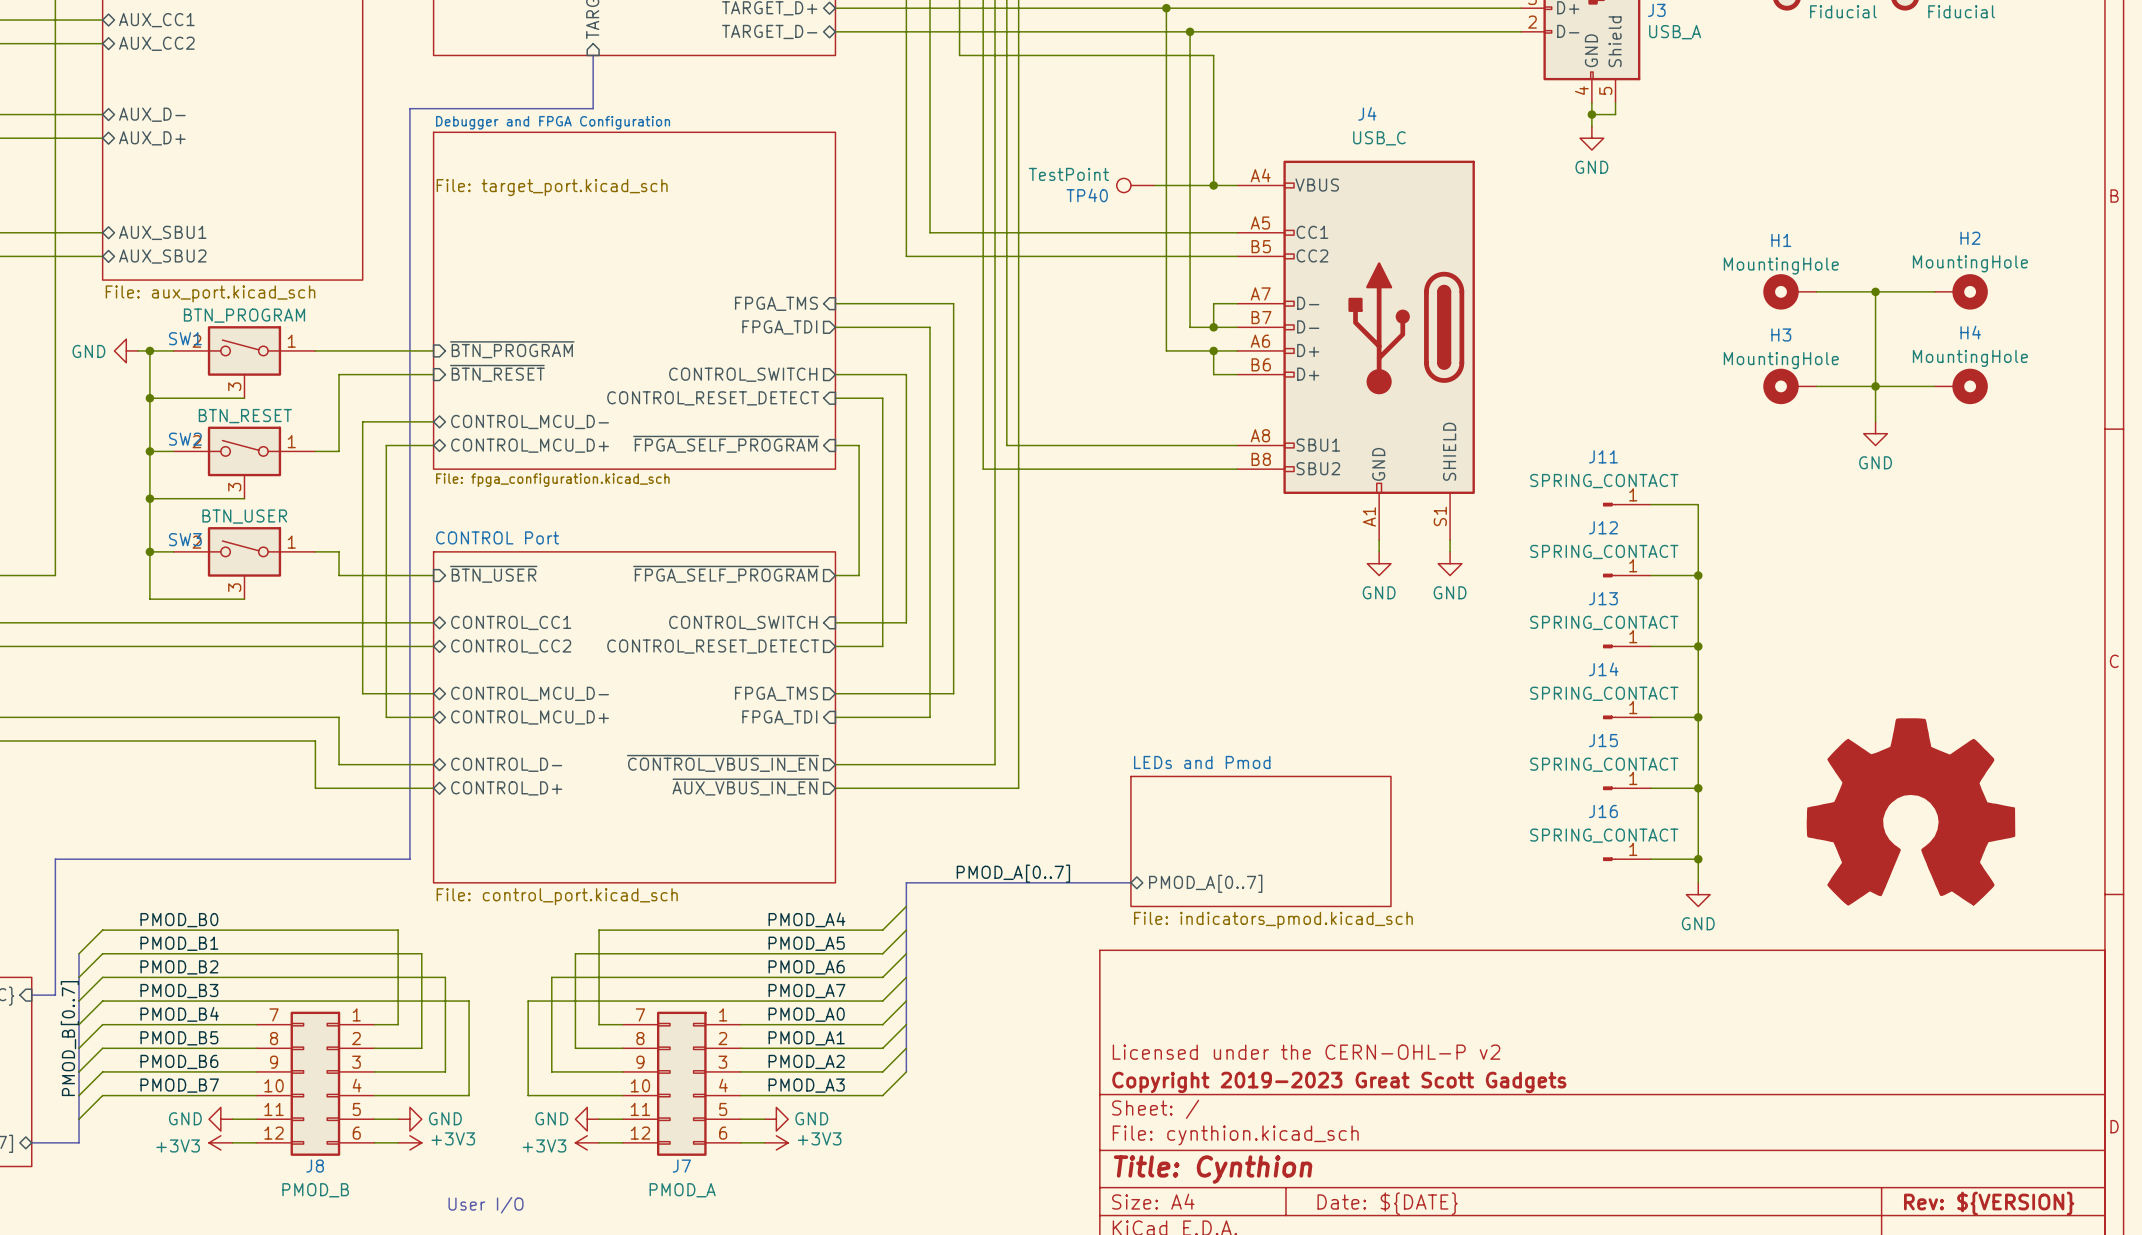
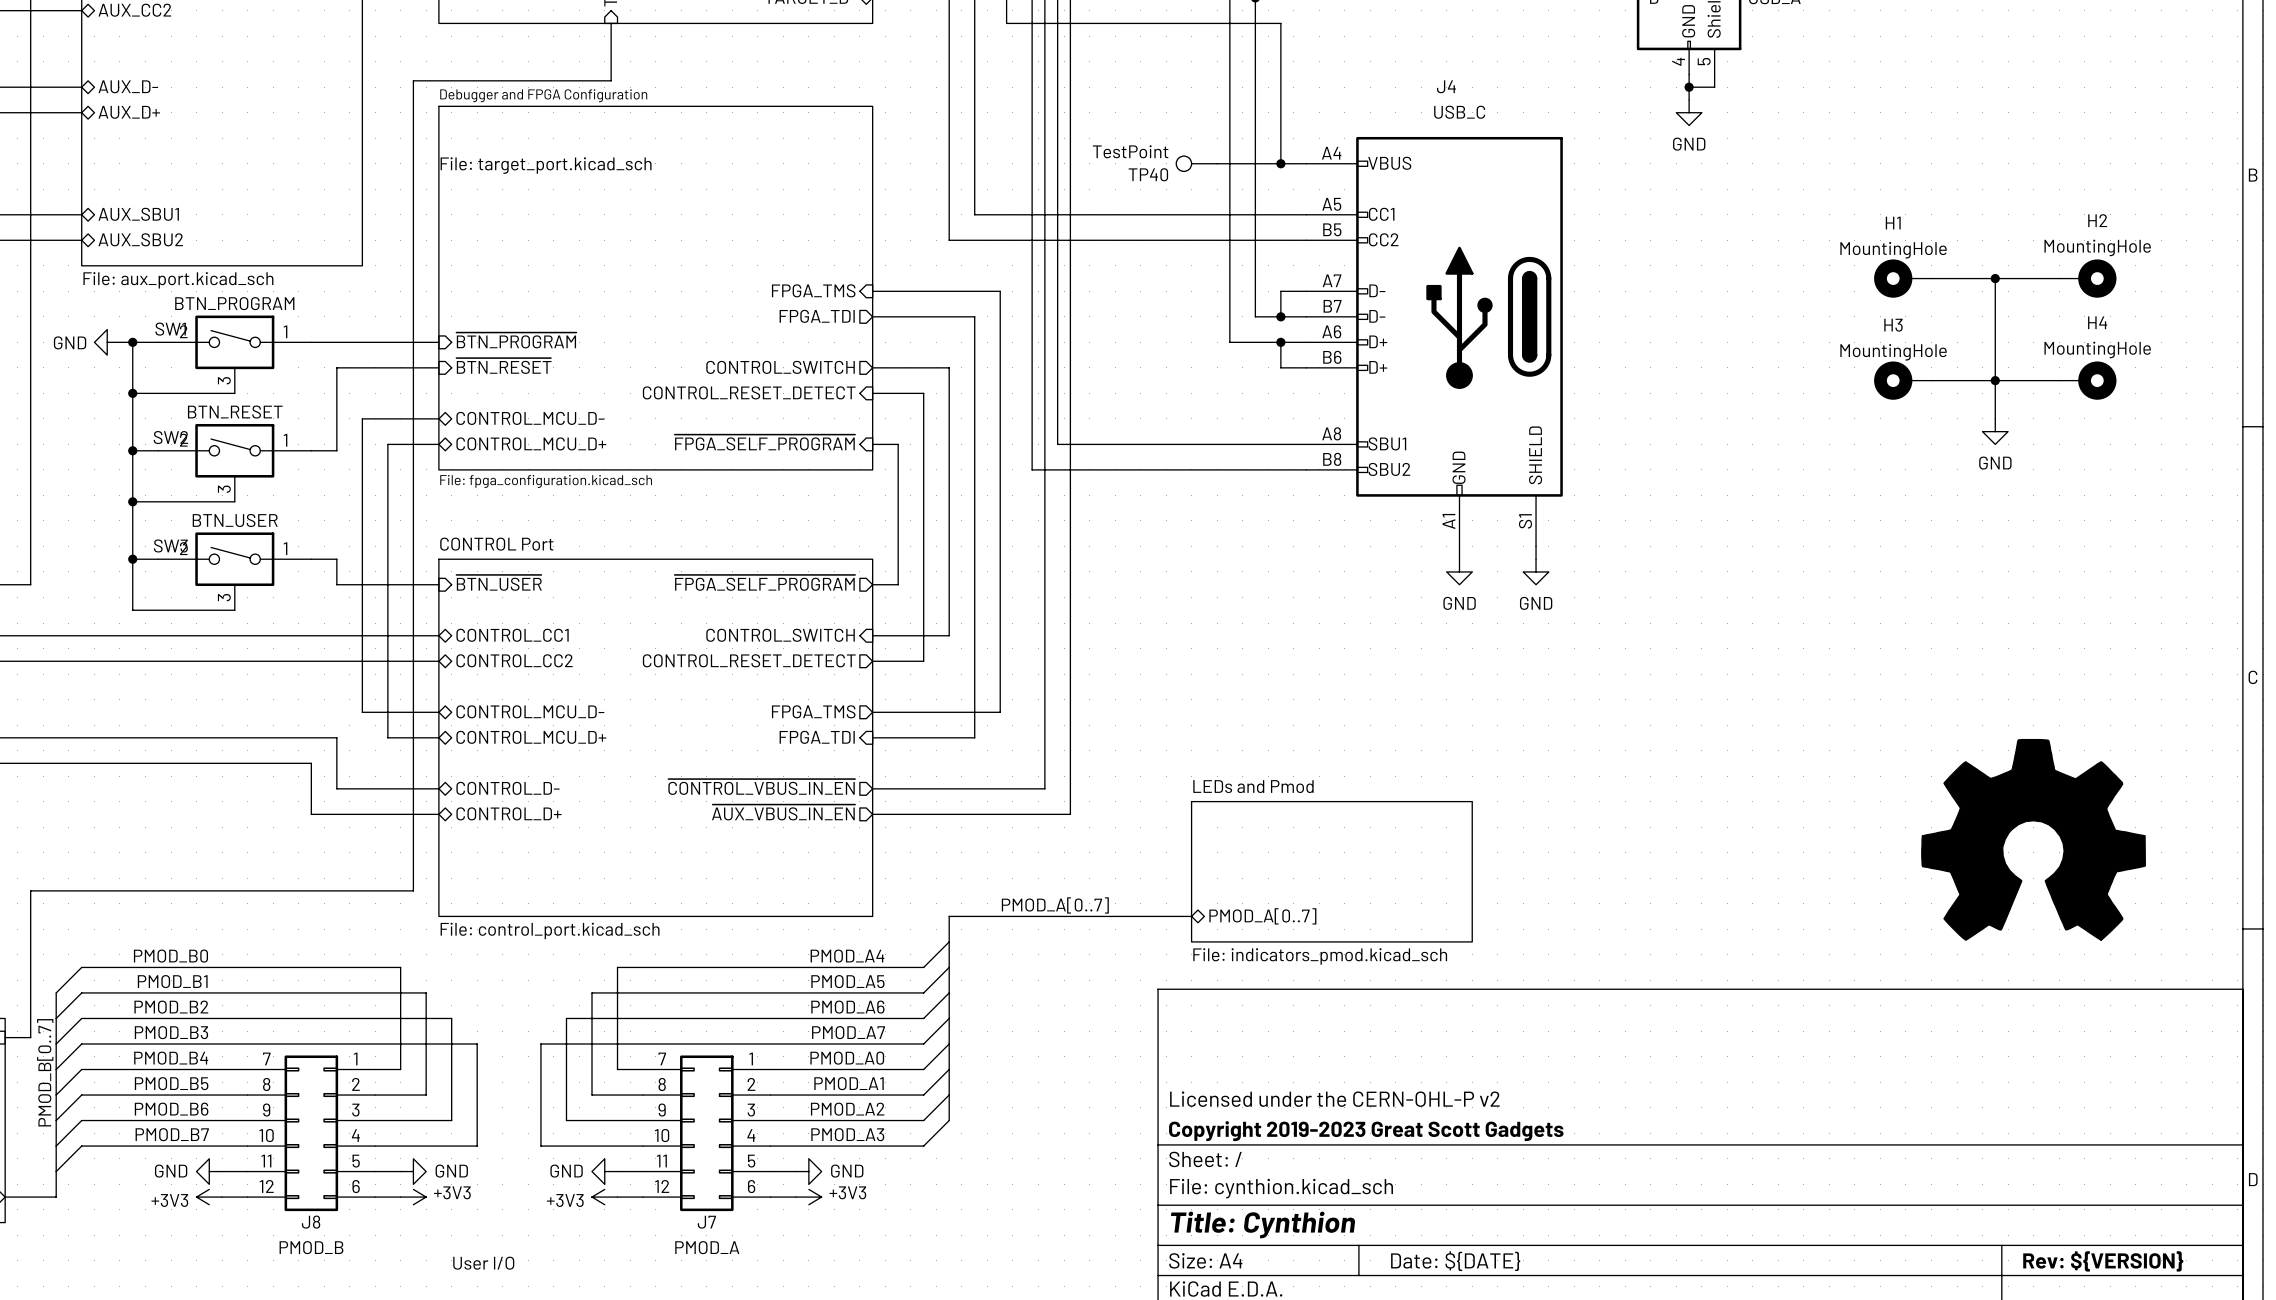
J11: SPRING_CONTACT (1626, 504) -> none
wire: (1650, 504) (1698, 504) (1698, 882) -> none
J12: SPRING_CONTACT (1626, 575) -> none
wire: (1650, 575) (1698, 575) -> none
junction: (1698, 575) -> none
J13: SPRING_CONTACT (1626, 646) -> none
wire: (1650, 646) (1698, 646) -> none
junction: (1698, 646) -> none
J14: SPRING_CONTACT (1626, 717) -> none
wire: (1650, 717) (1698, 717) -> none
junction: (1698, 717) -> none
J15: SPRING_CONTACT (1626, 788) -> none
wire: (1650, 788) (1698, 788) -> none
junction: (1698, 788) -> none
J16: SPRING_CONTACT (1626, 859) -> none
wire: (1650, 859) (1698, 859) -> none
junction: (1698, 859) -> none
power symbol: GND (1698, 894) -> none

